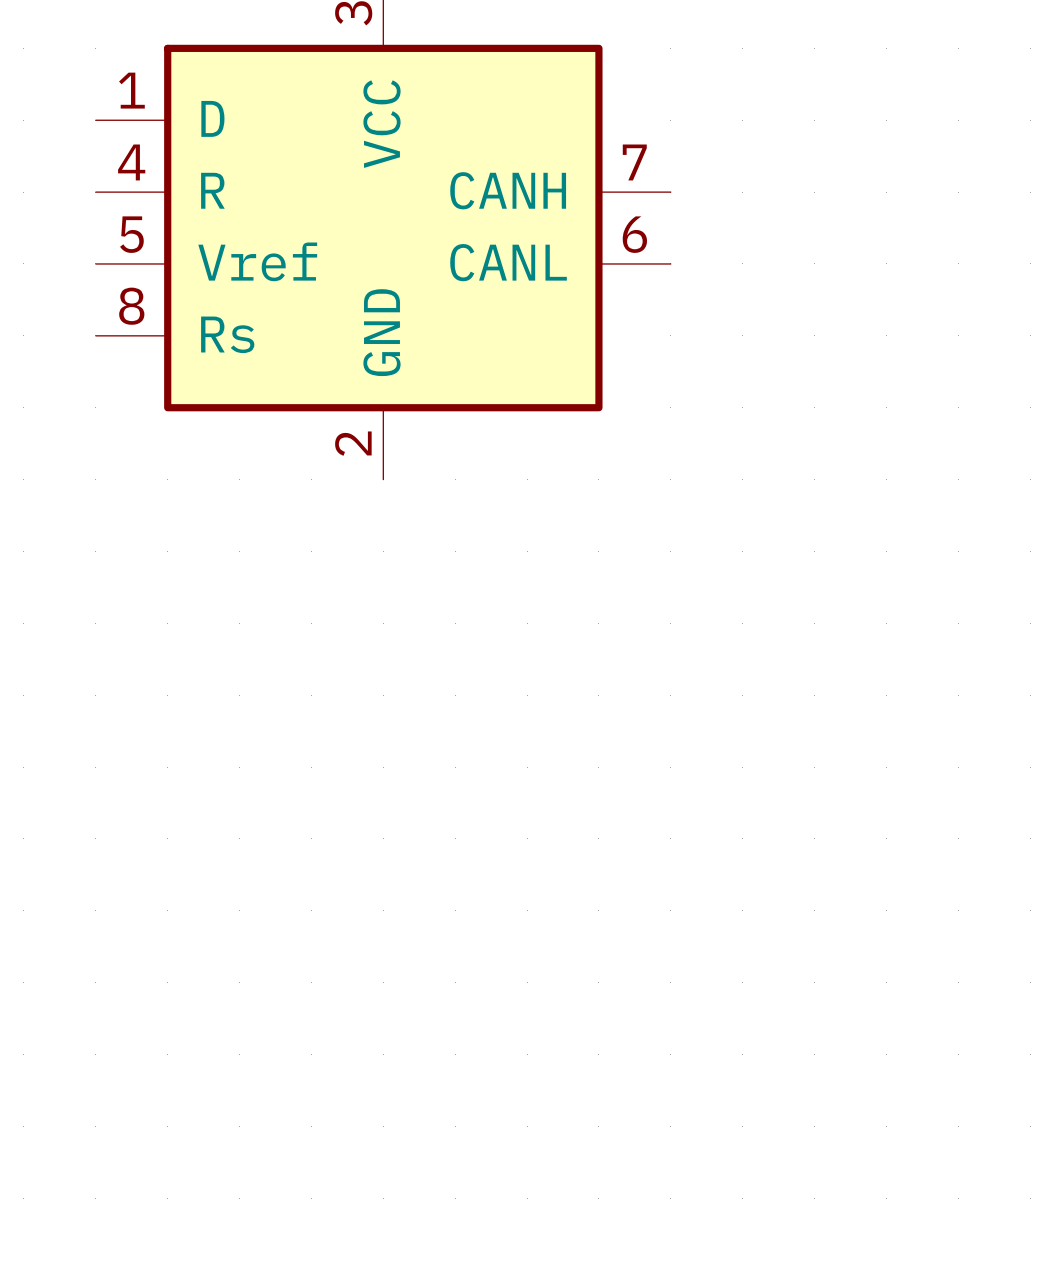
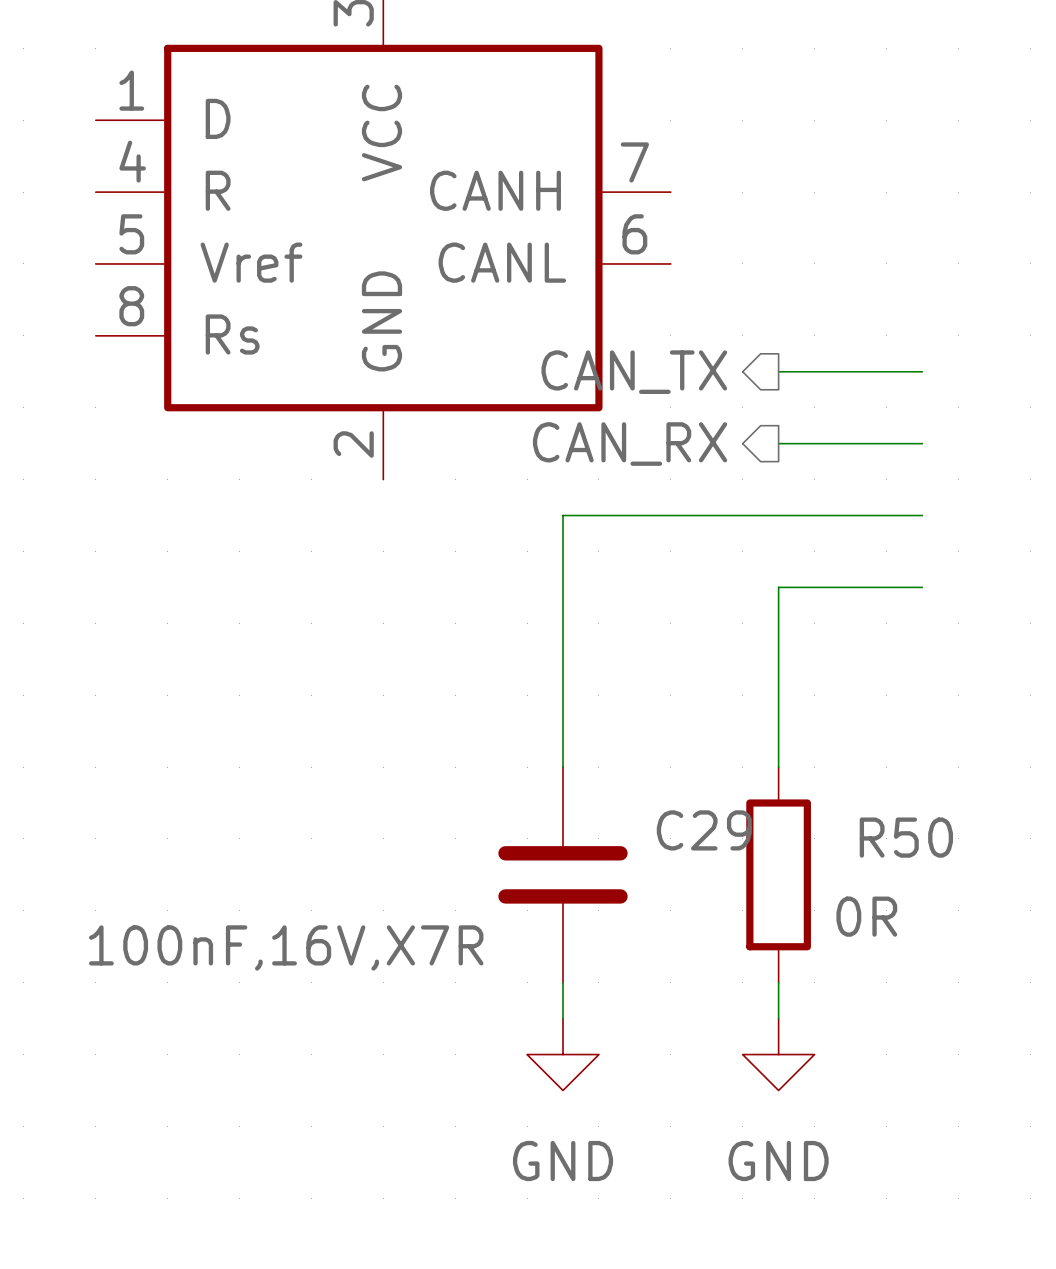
wire: none -> (778, 371) (922, 371)
hierarchical label: none -> CAN_TX (634, 372)
wire: none -> (778, 443) (922, 443)
hierarchical label: none -> CAN_RX (630, 444)
wire: none -> (922, 515) (563, 515) (563, 767)
wire: none -> (922, 587) (778, 587) (778, 767)
C29: none -> 100nF,16V,X7R (563, 874)
R50: none -> 0R (778, 874)
wire: none -> (563, 982) (563, 1018)
wire: none -> (778, 982) (778, 1018)
power symbol: none -> GND (563, 1054)
power symbol: none -> GND (778, 1054)

